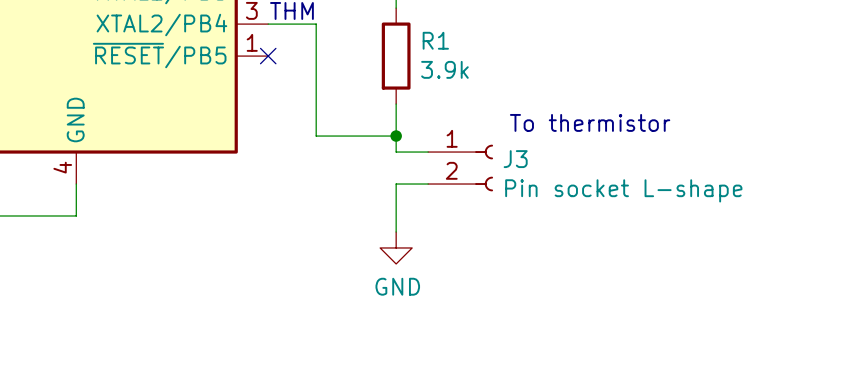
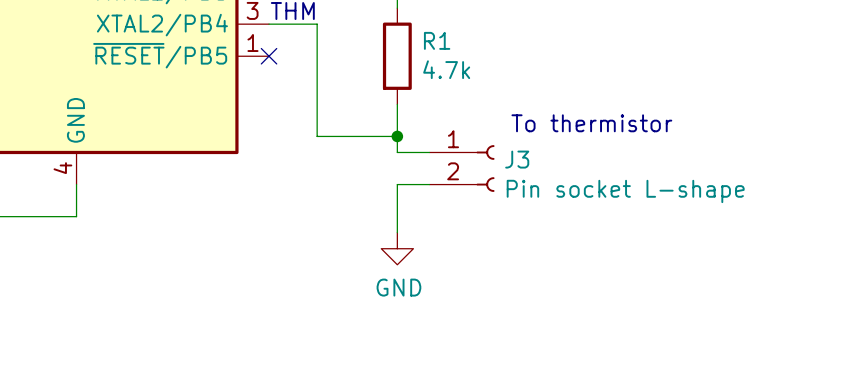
R1 value: 3.9k (444, 69) -> 4.7k (446, 69)

